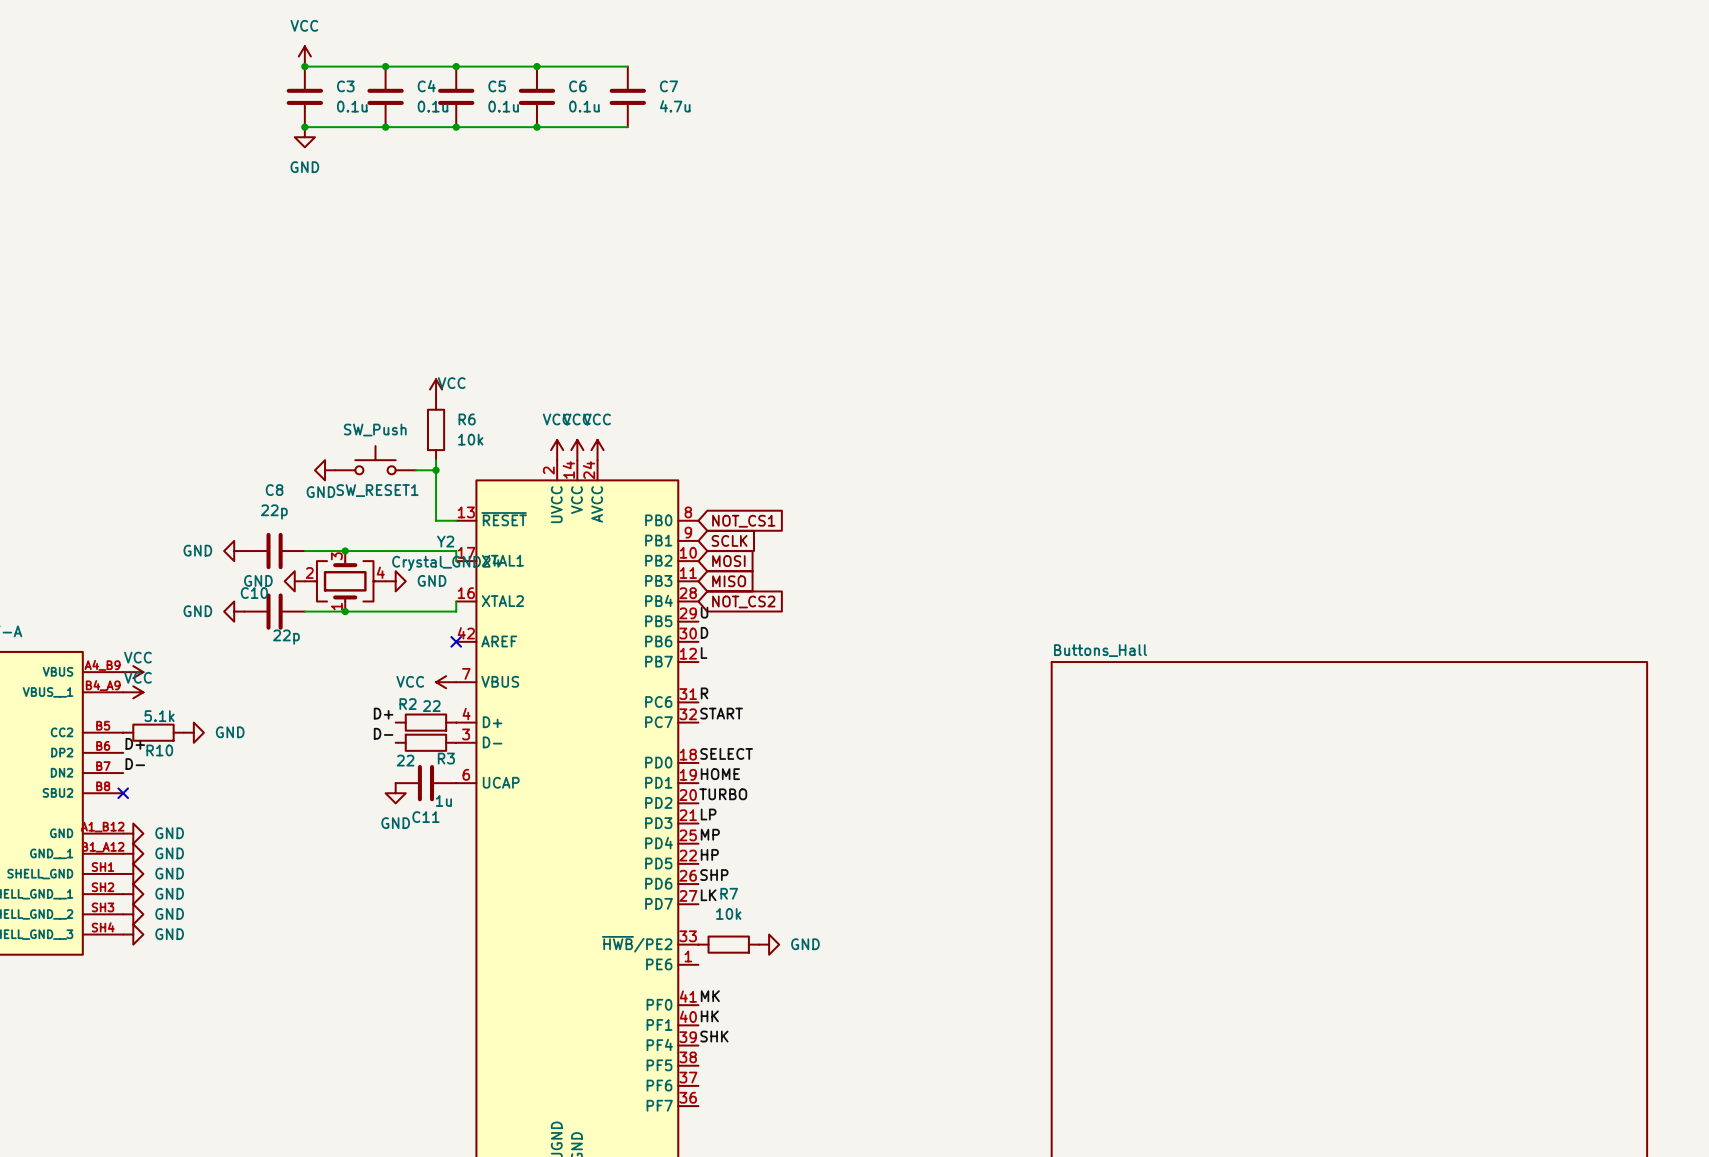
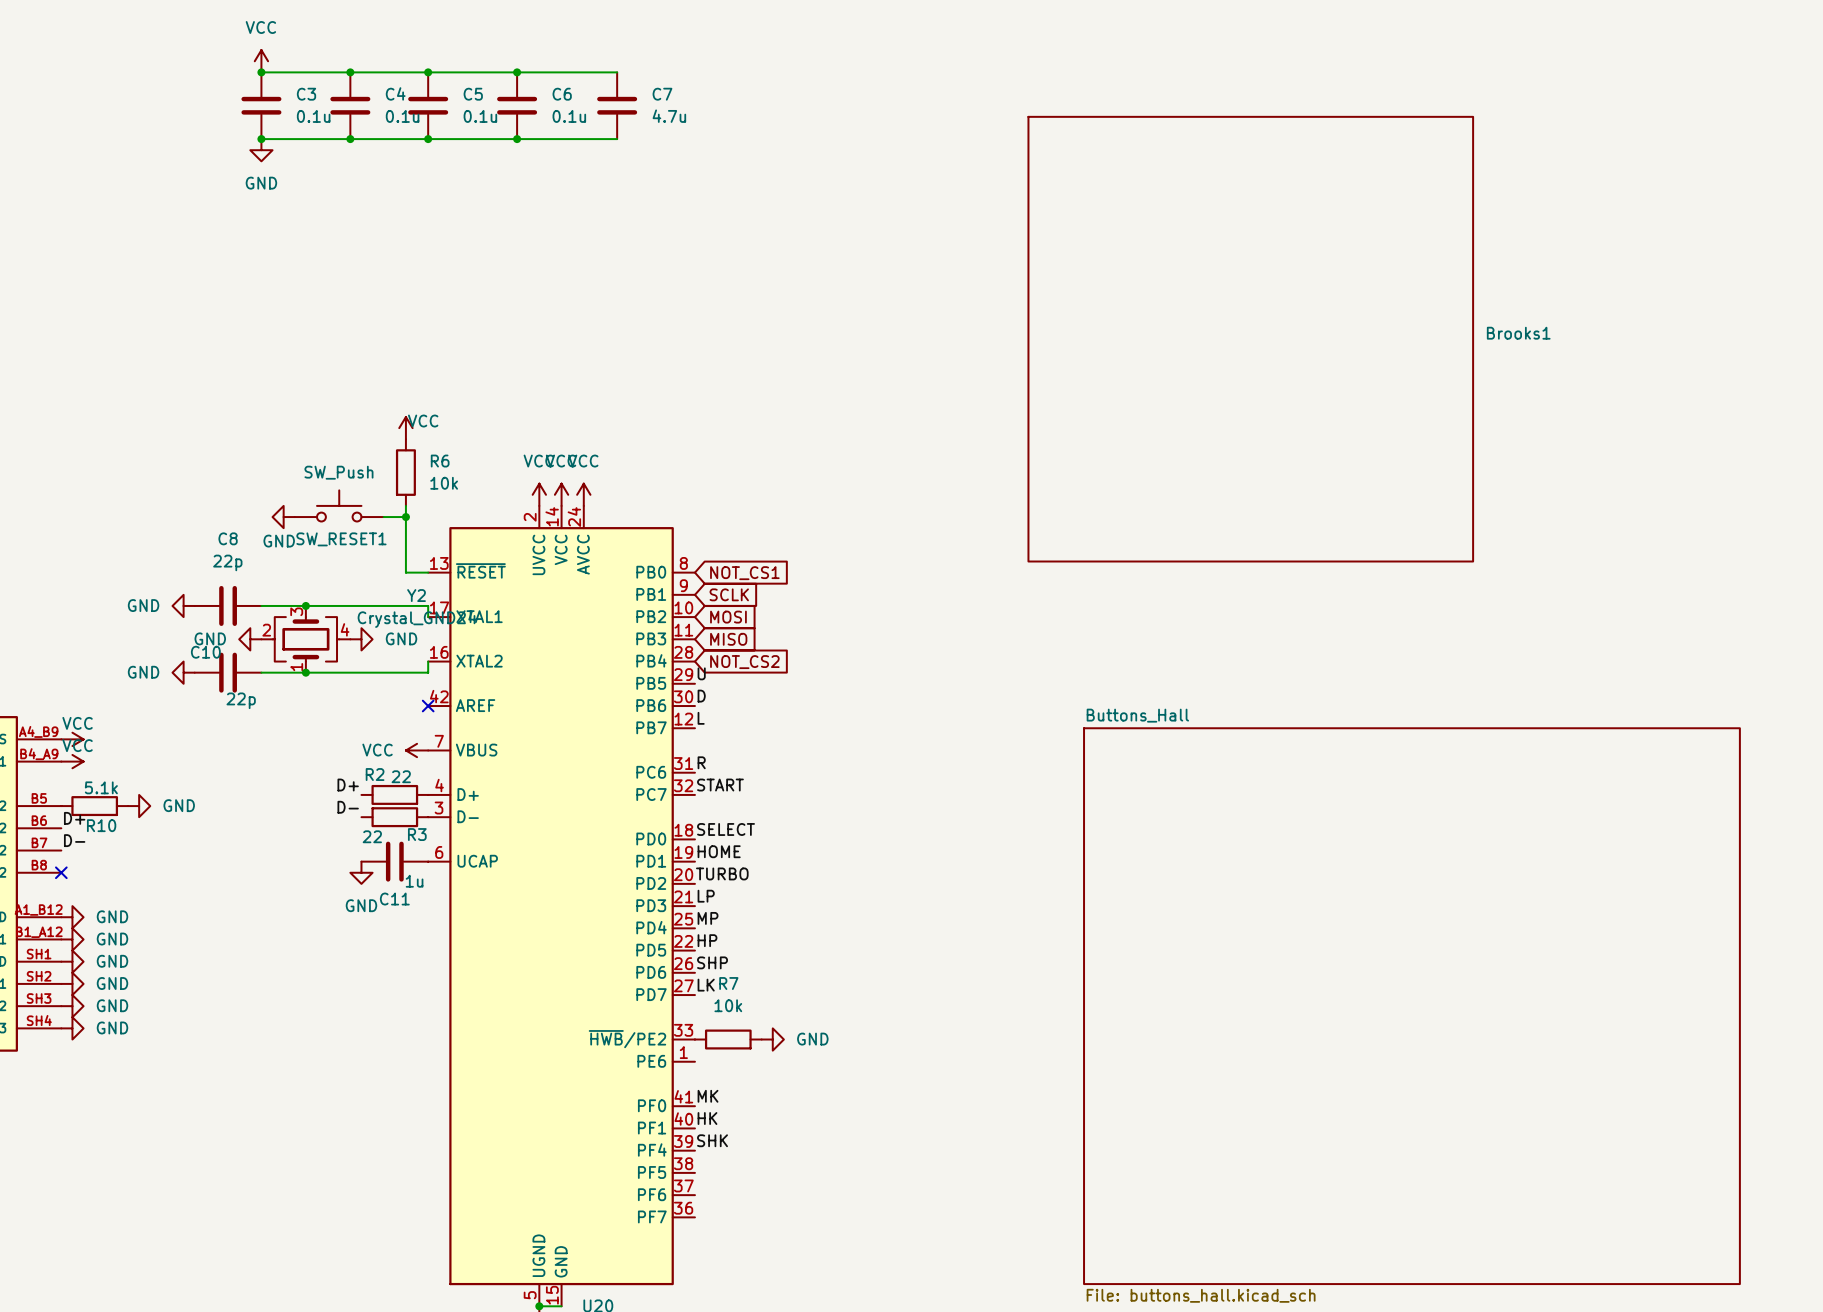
Brooks1: none -> (1250, 339)

